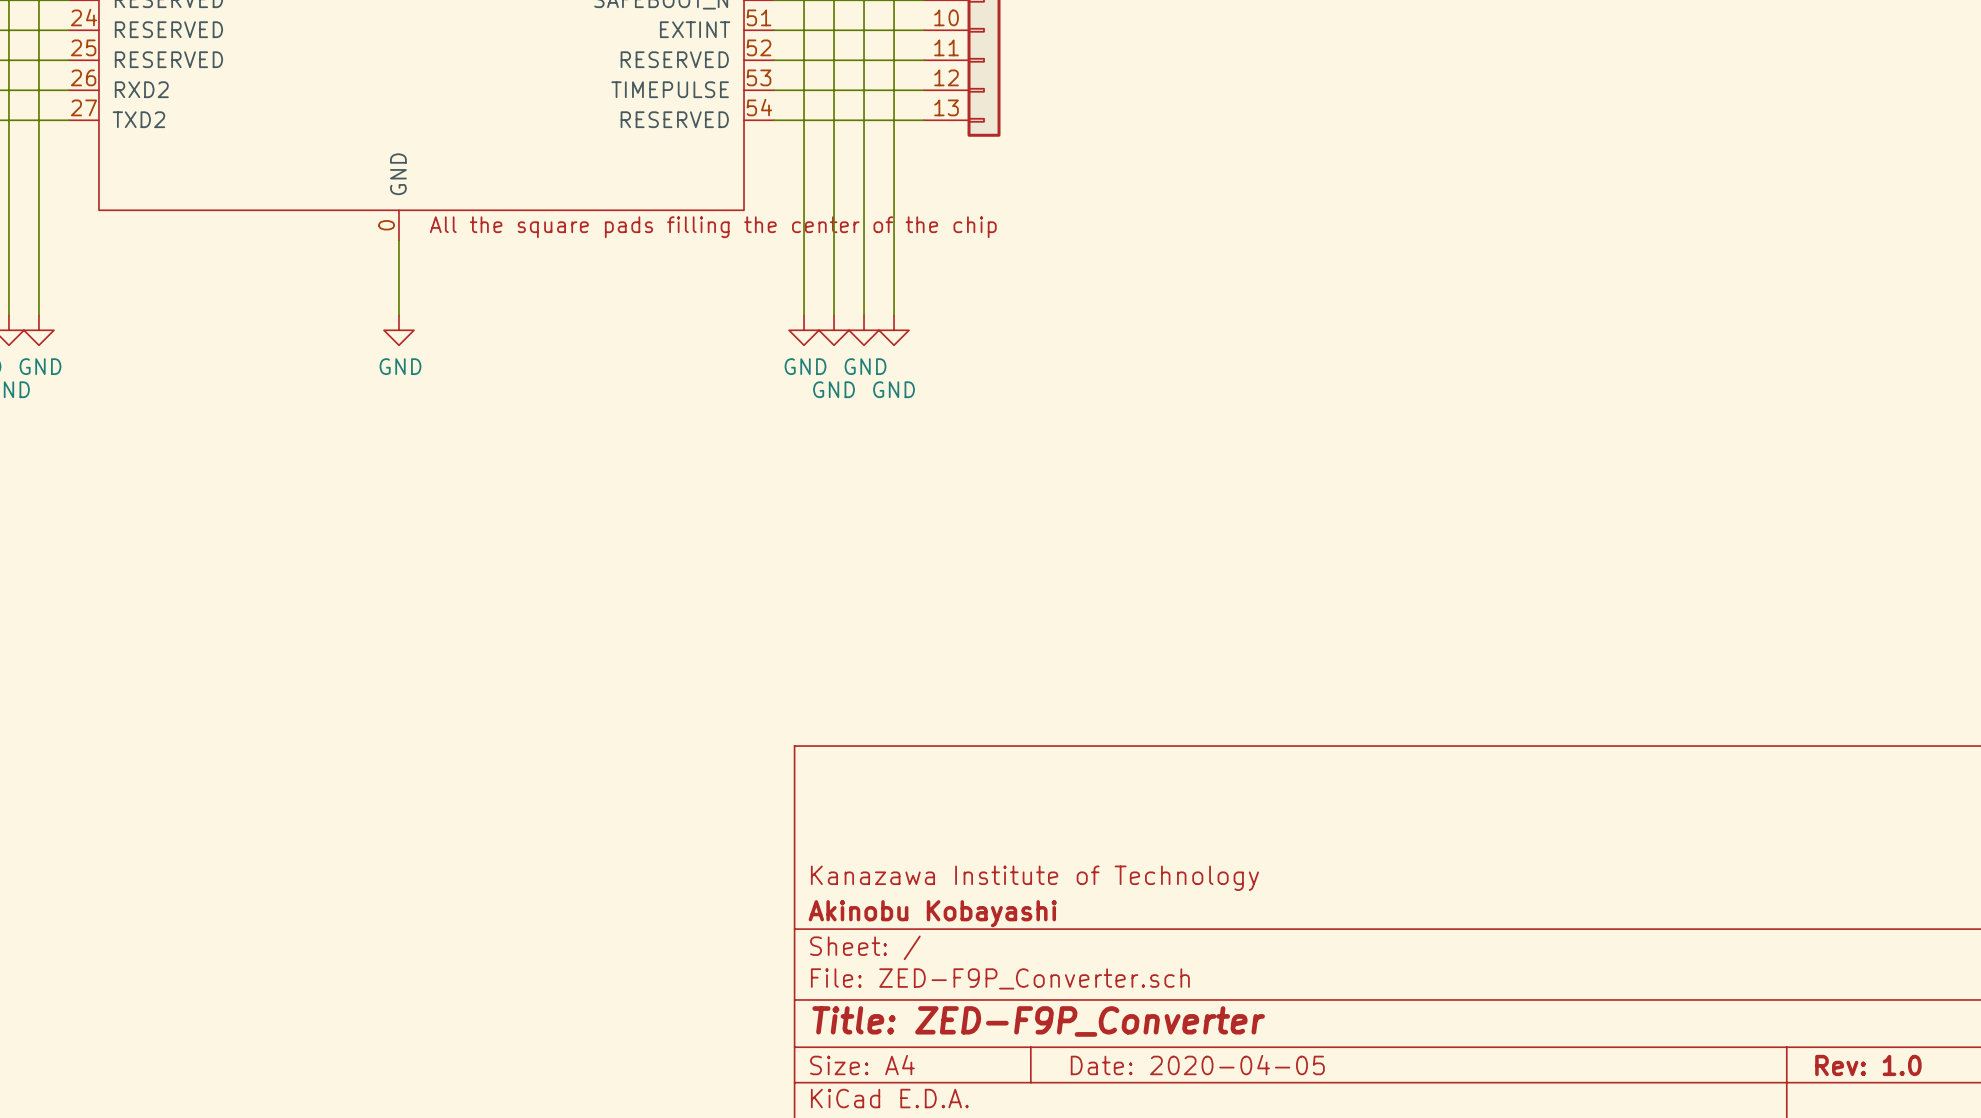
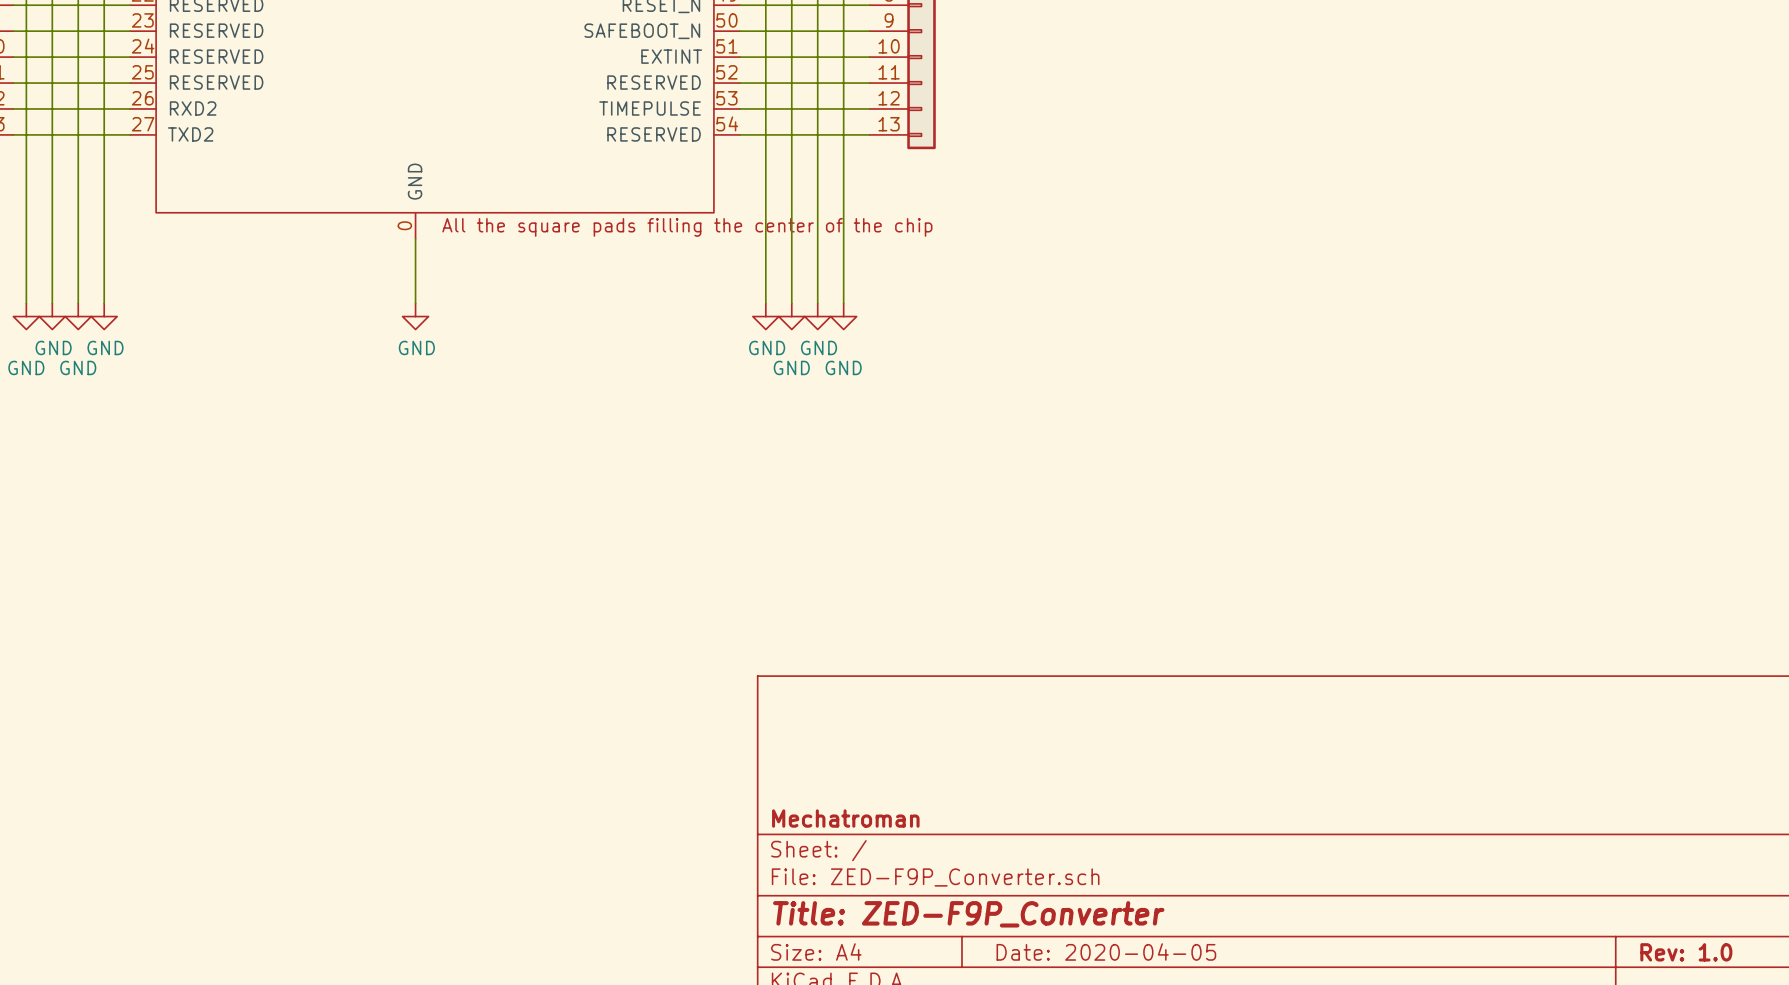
title block: Kanazawa Institute of Technology (1034, 878) -> none
title block: Akinobu Kobayashi (932, 913) -> Mechatroman (845, 818)

